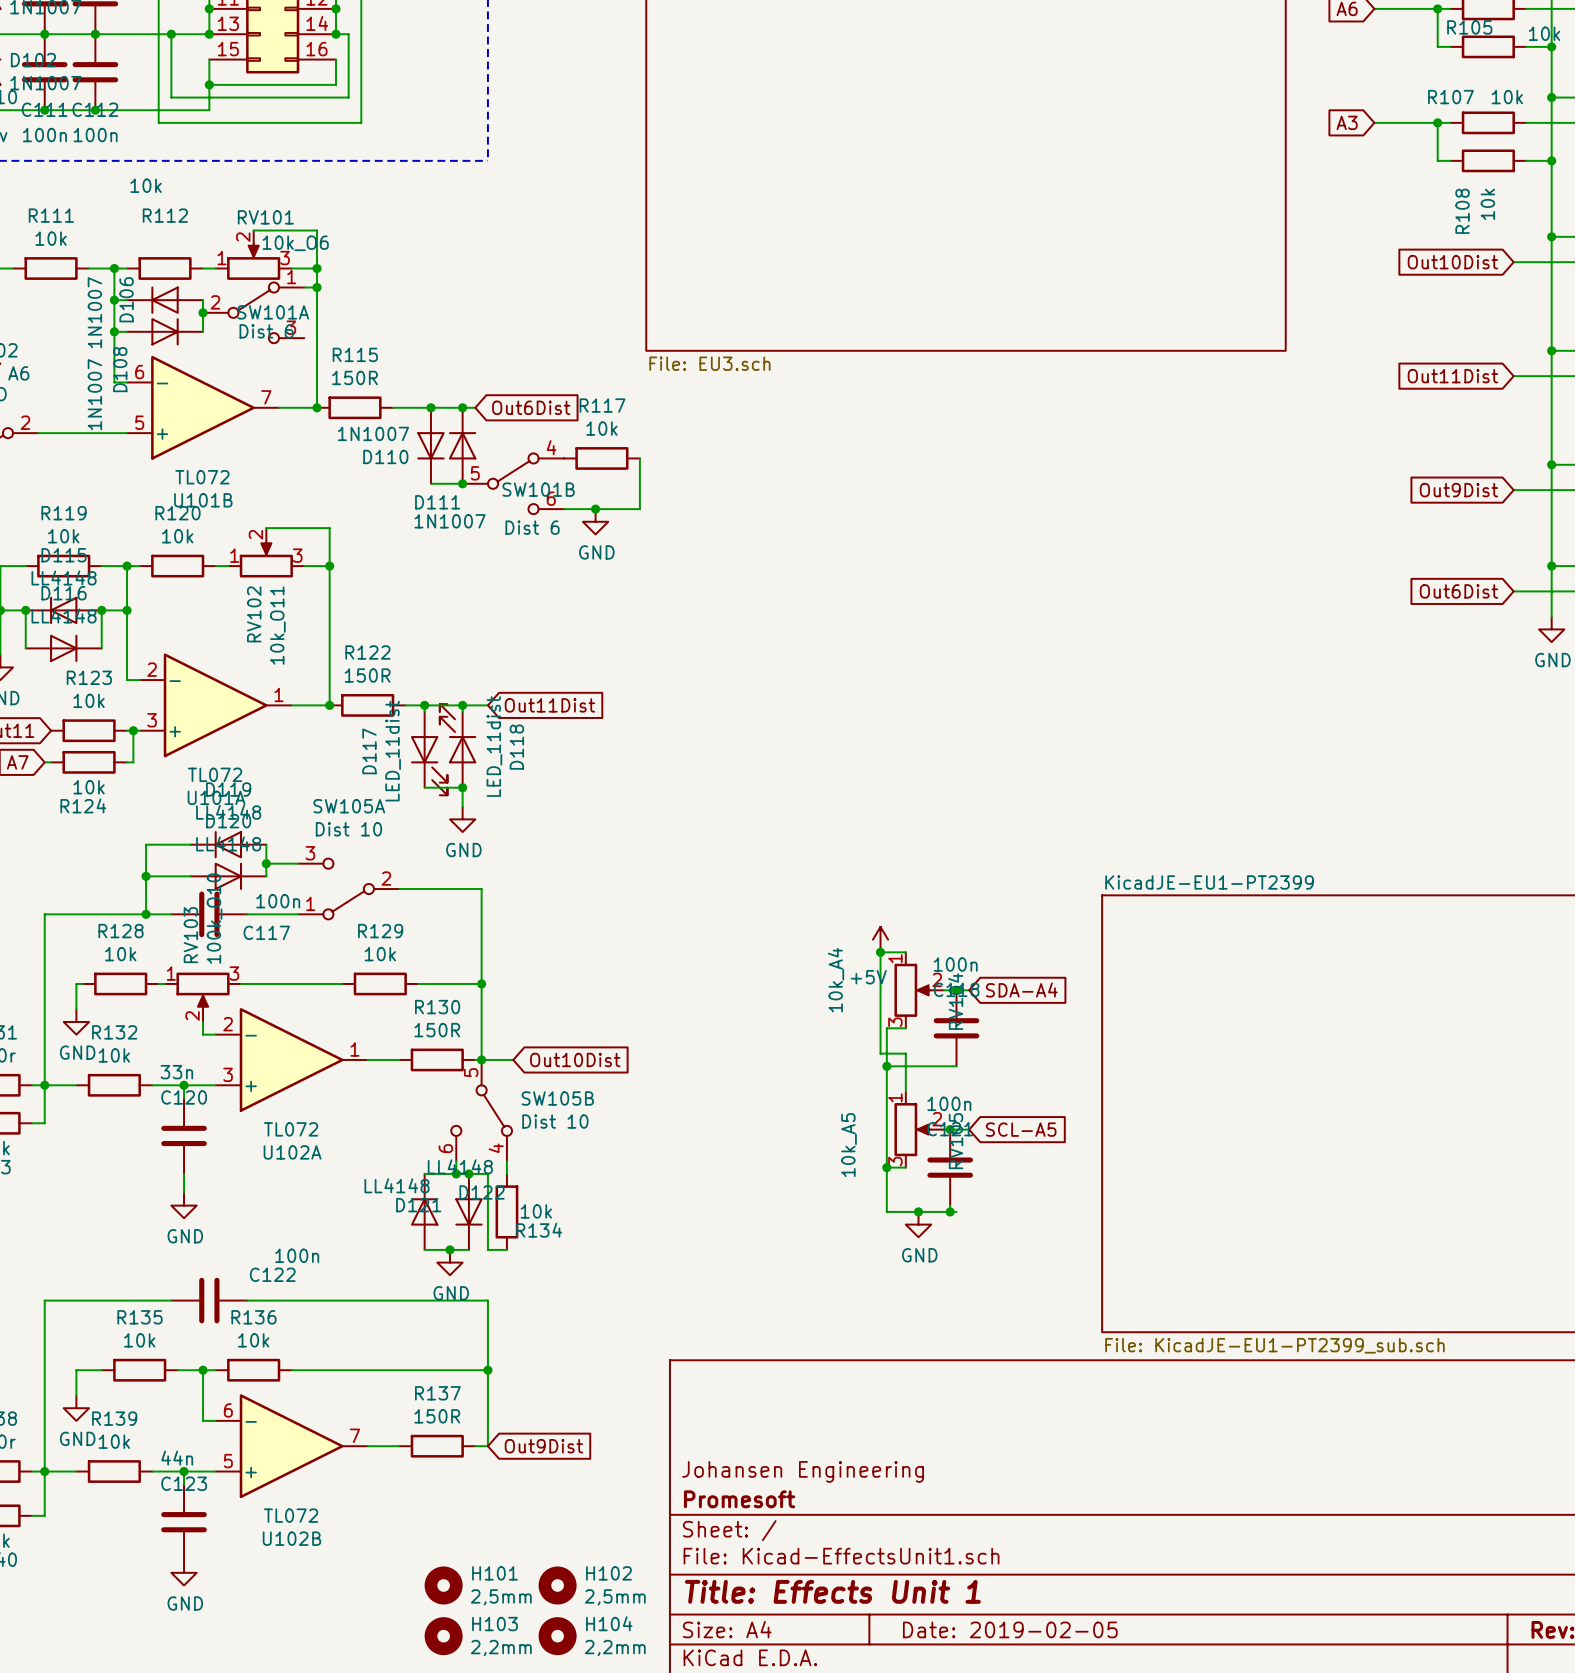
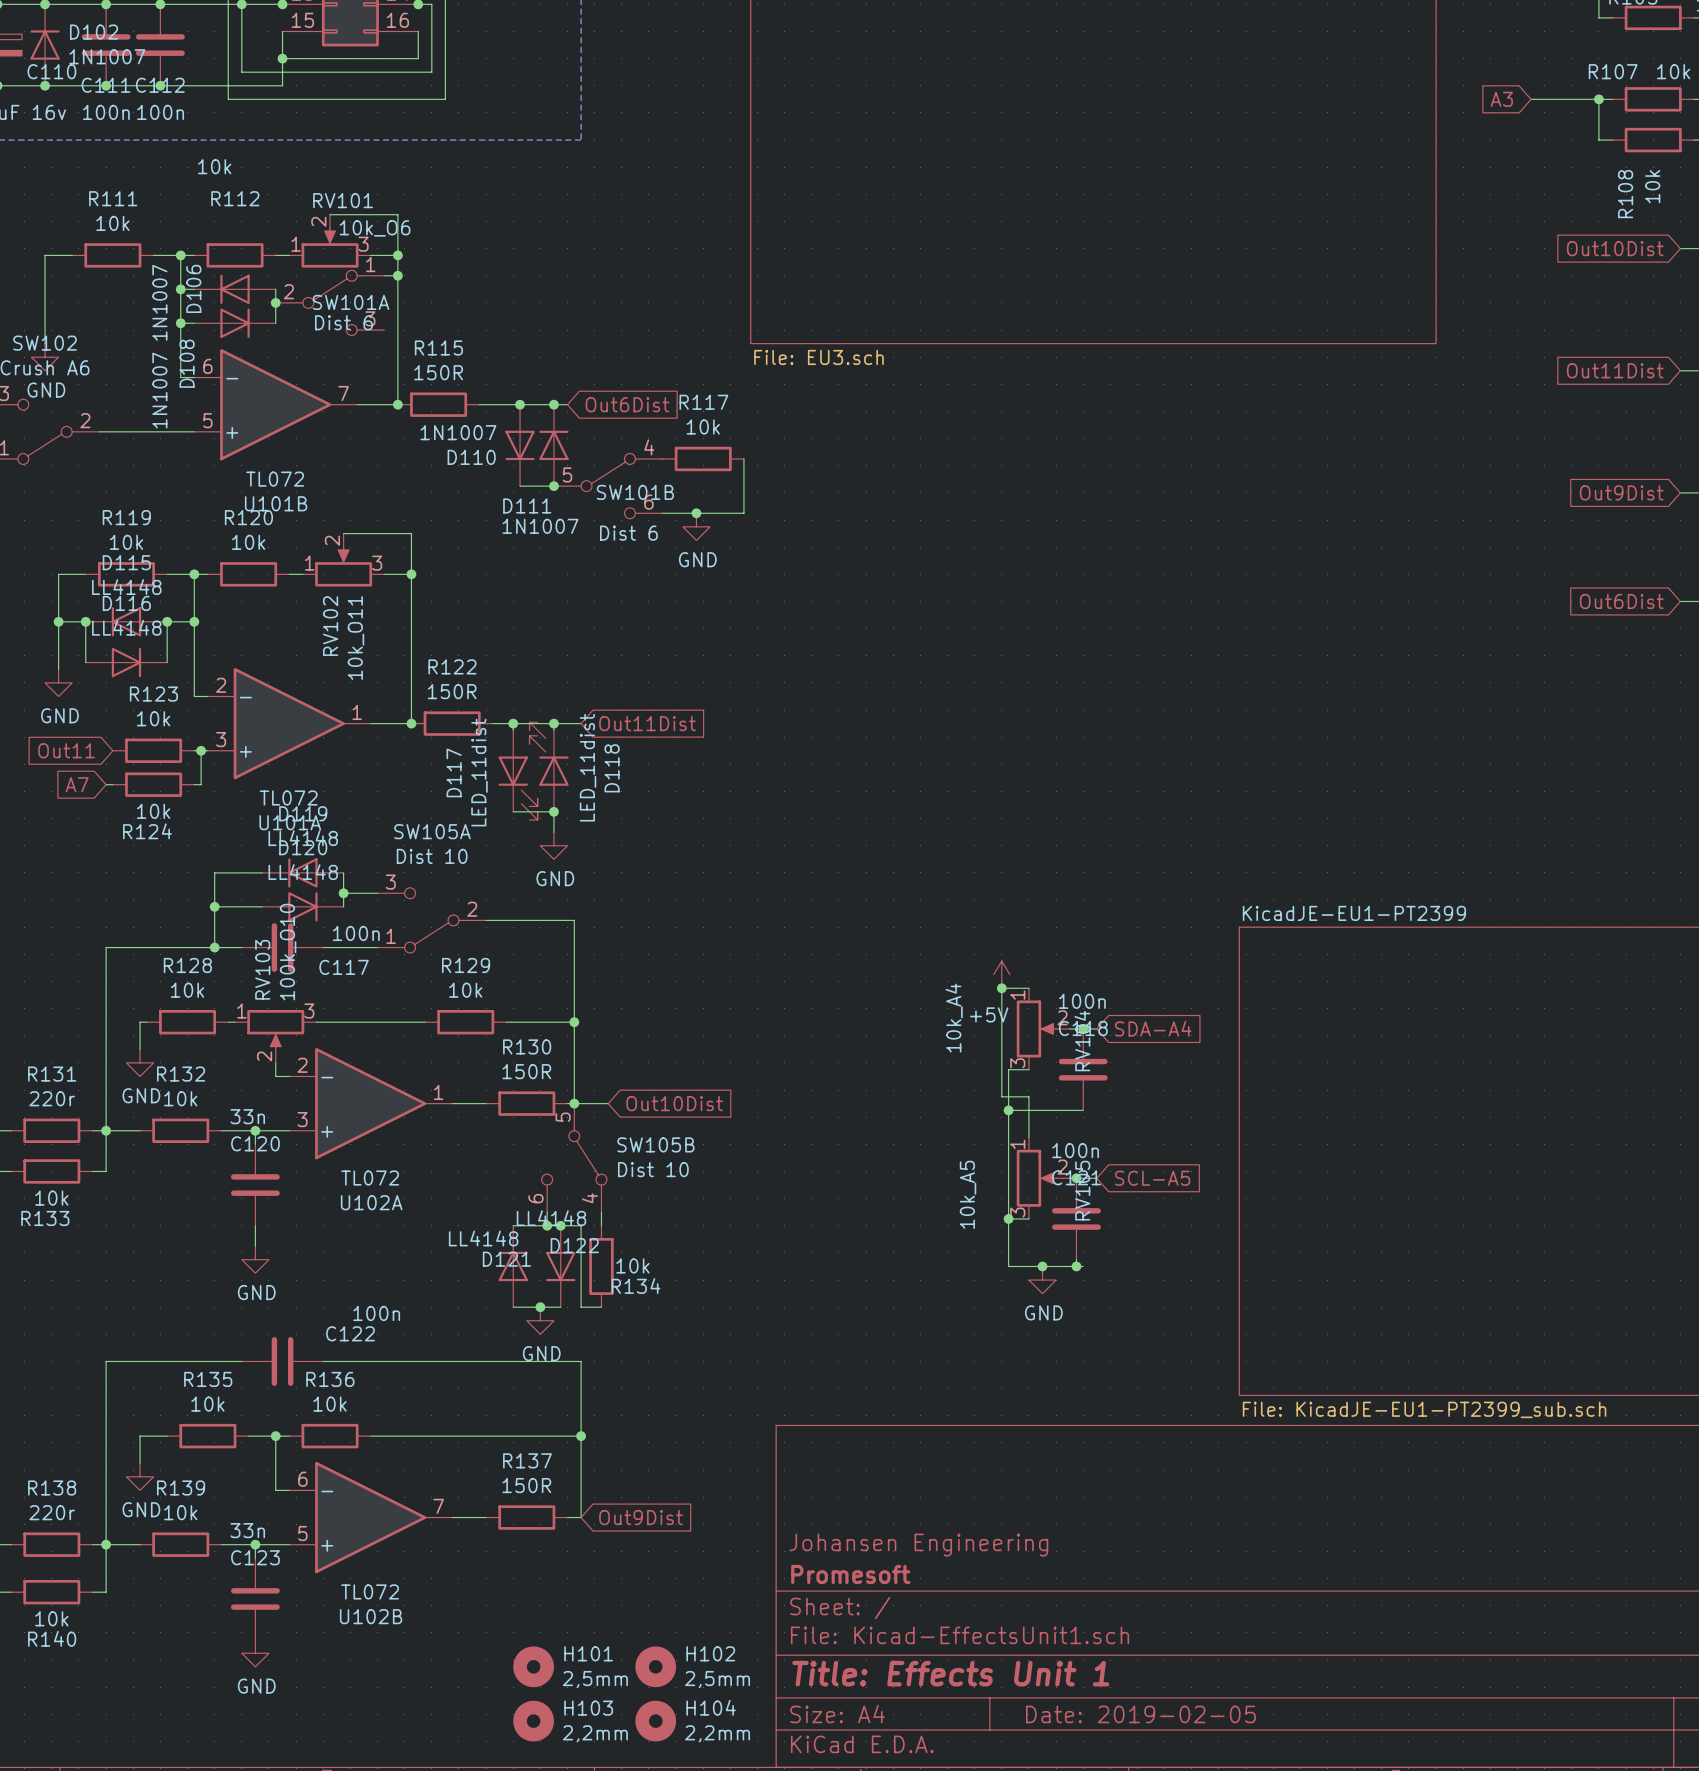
C123 value: 44n (177, 1458) -> 33n (247, 1530)

